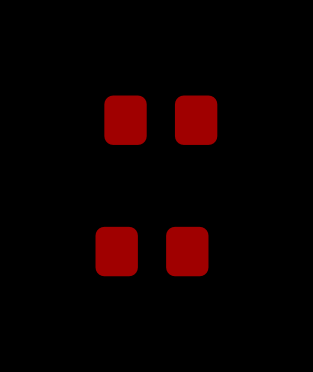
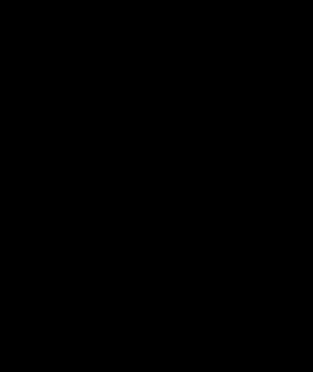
part: (160, 120) -> none
part: (152, 251) -> none

